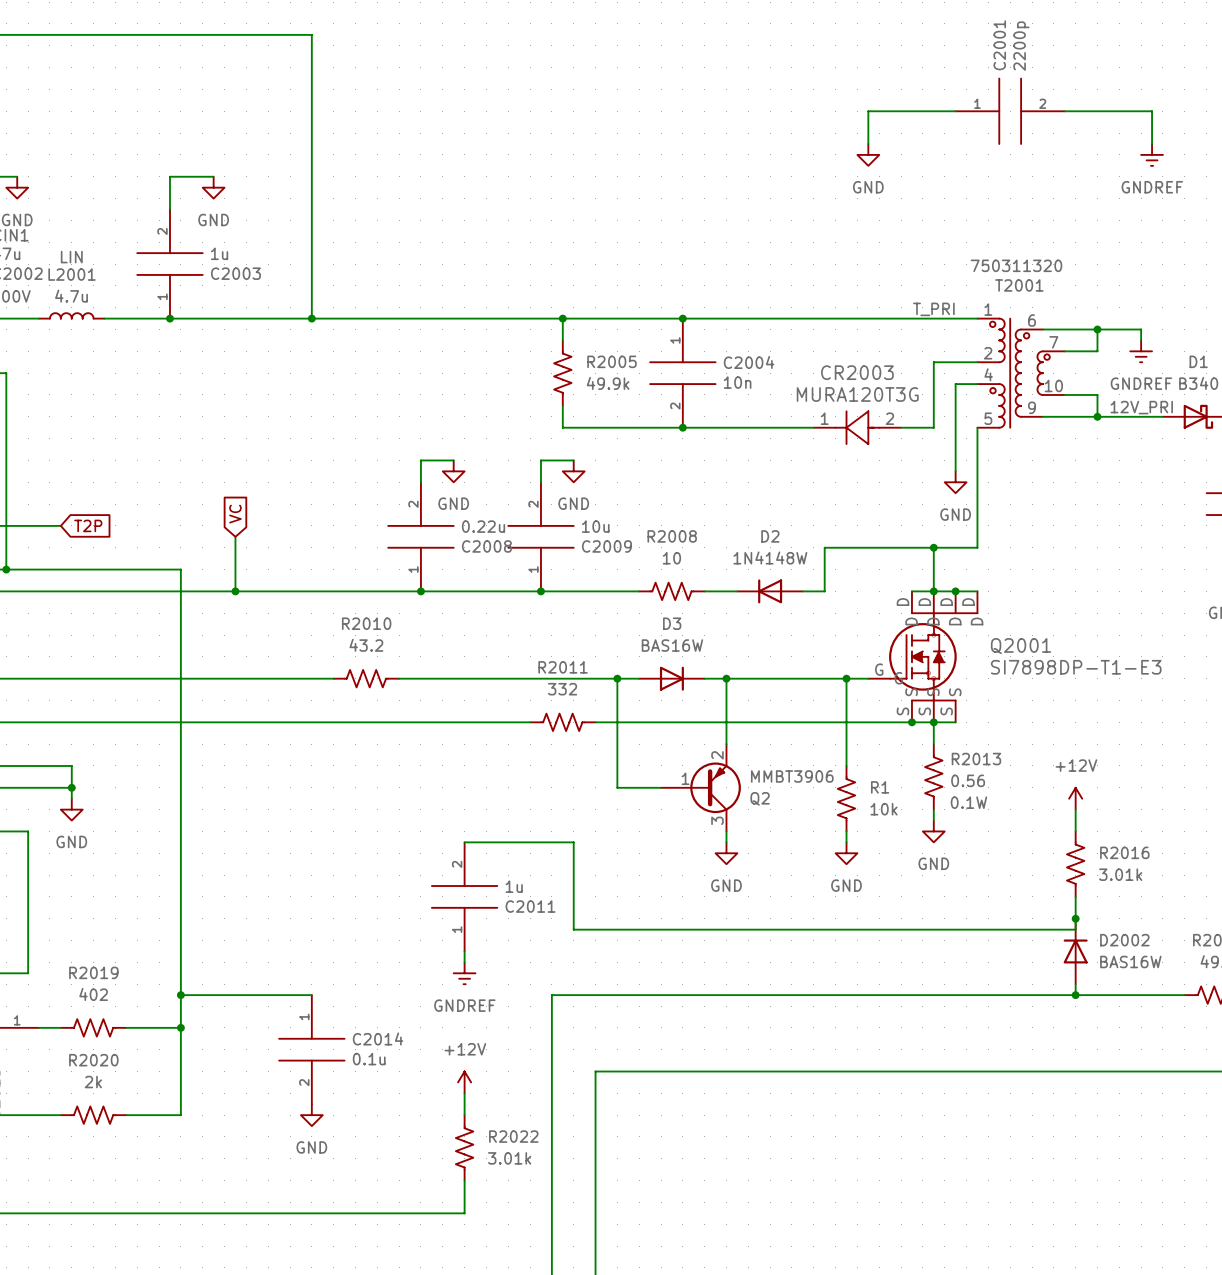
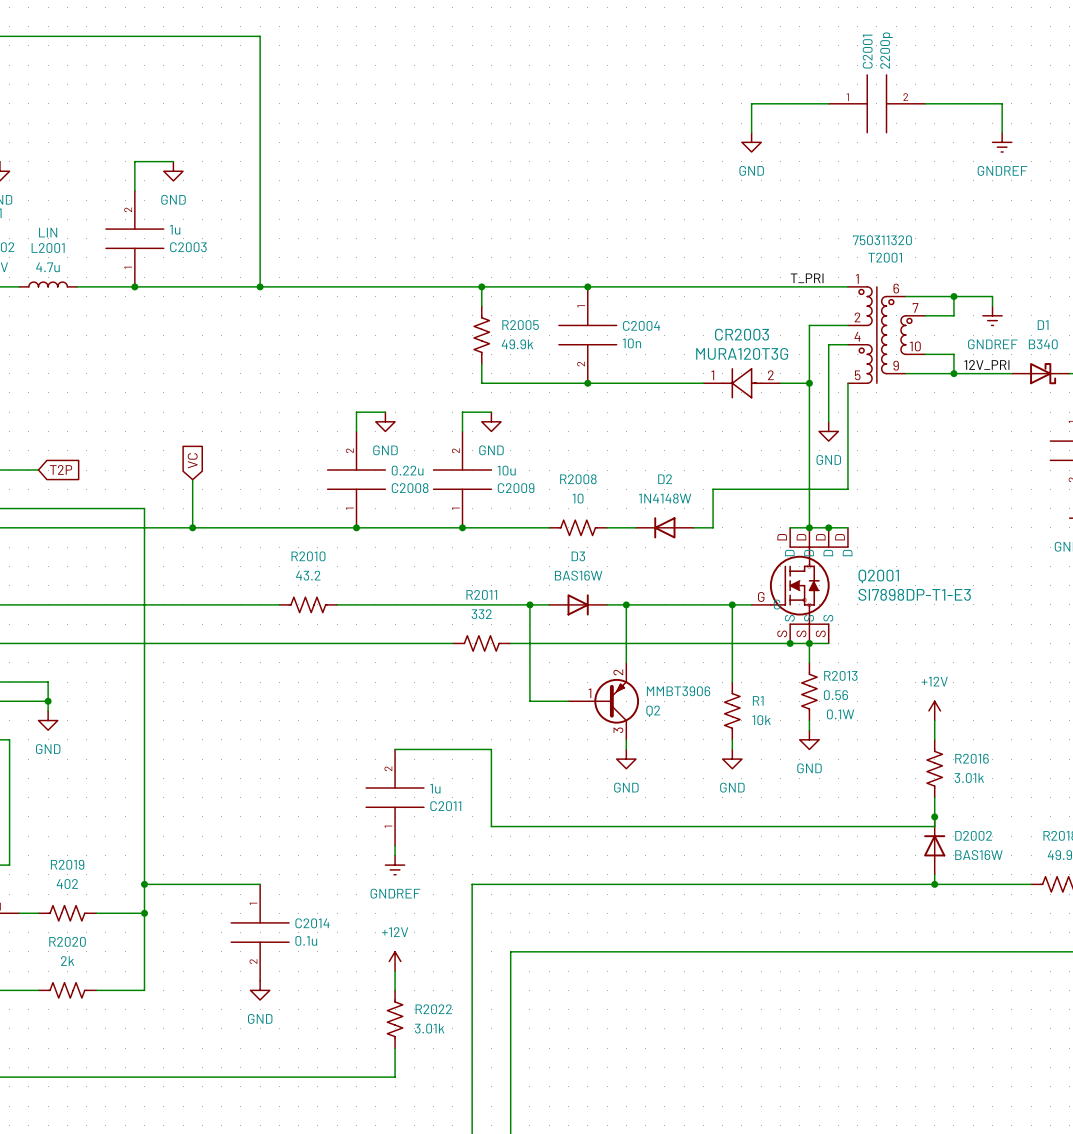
wire: none -> (809, 383) (809, 489)
junction: none -> (809, 383)
junction: (933, 547) -> none

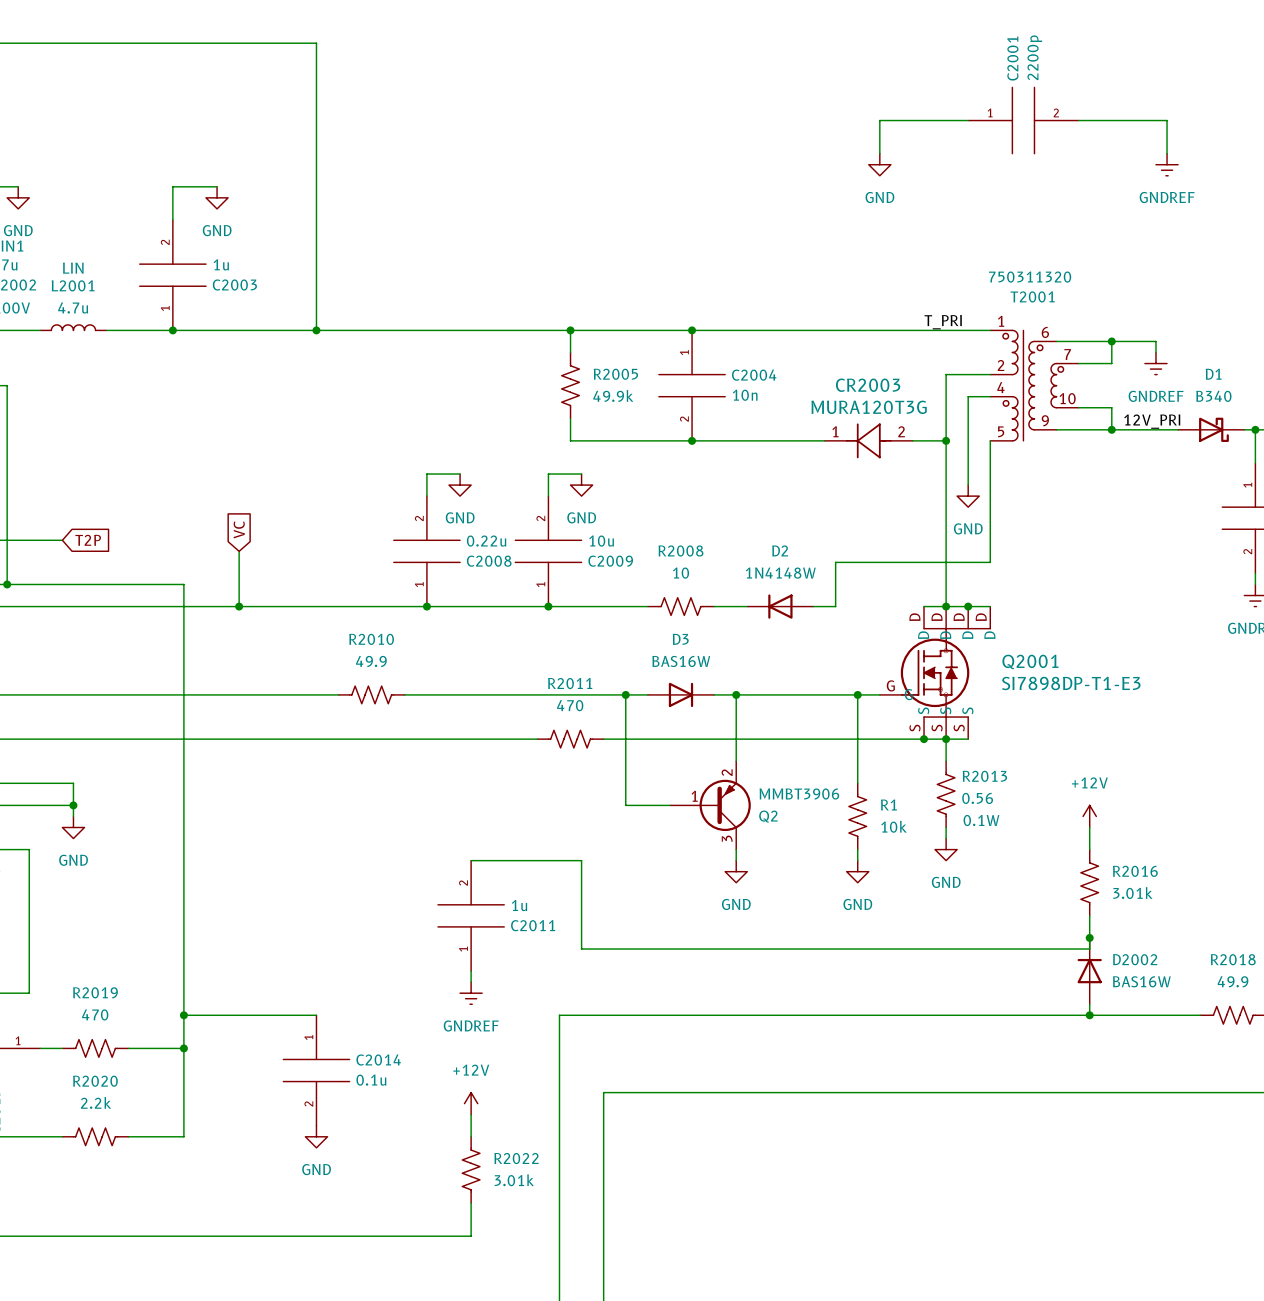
R2010 value: 43.2 (308, 575) -> 49.9 (371, 661)
R2011 value: 332 (481, 614) -> 470 (570, 705)
R2019 value: 402 (67, 884) -> 470 (95, 1014)
R2020 value: 2k (67, 961) -> 2.2k (96, 1102)

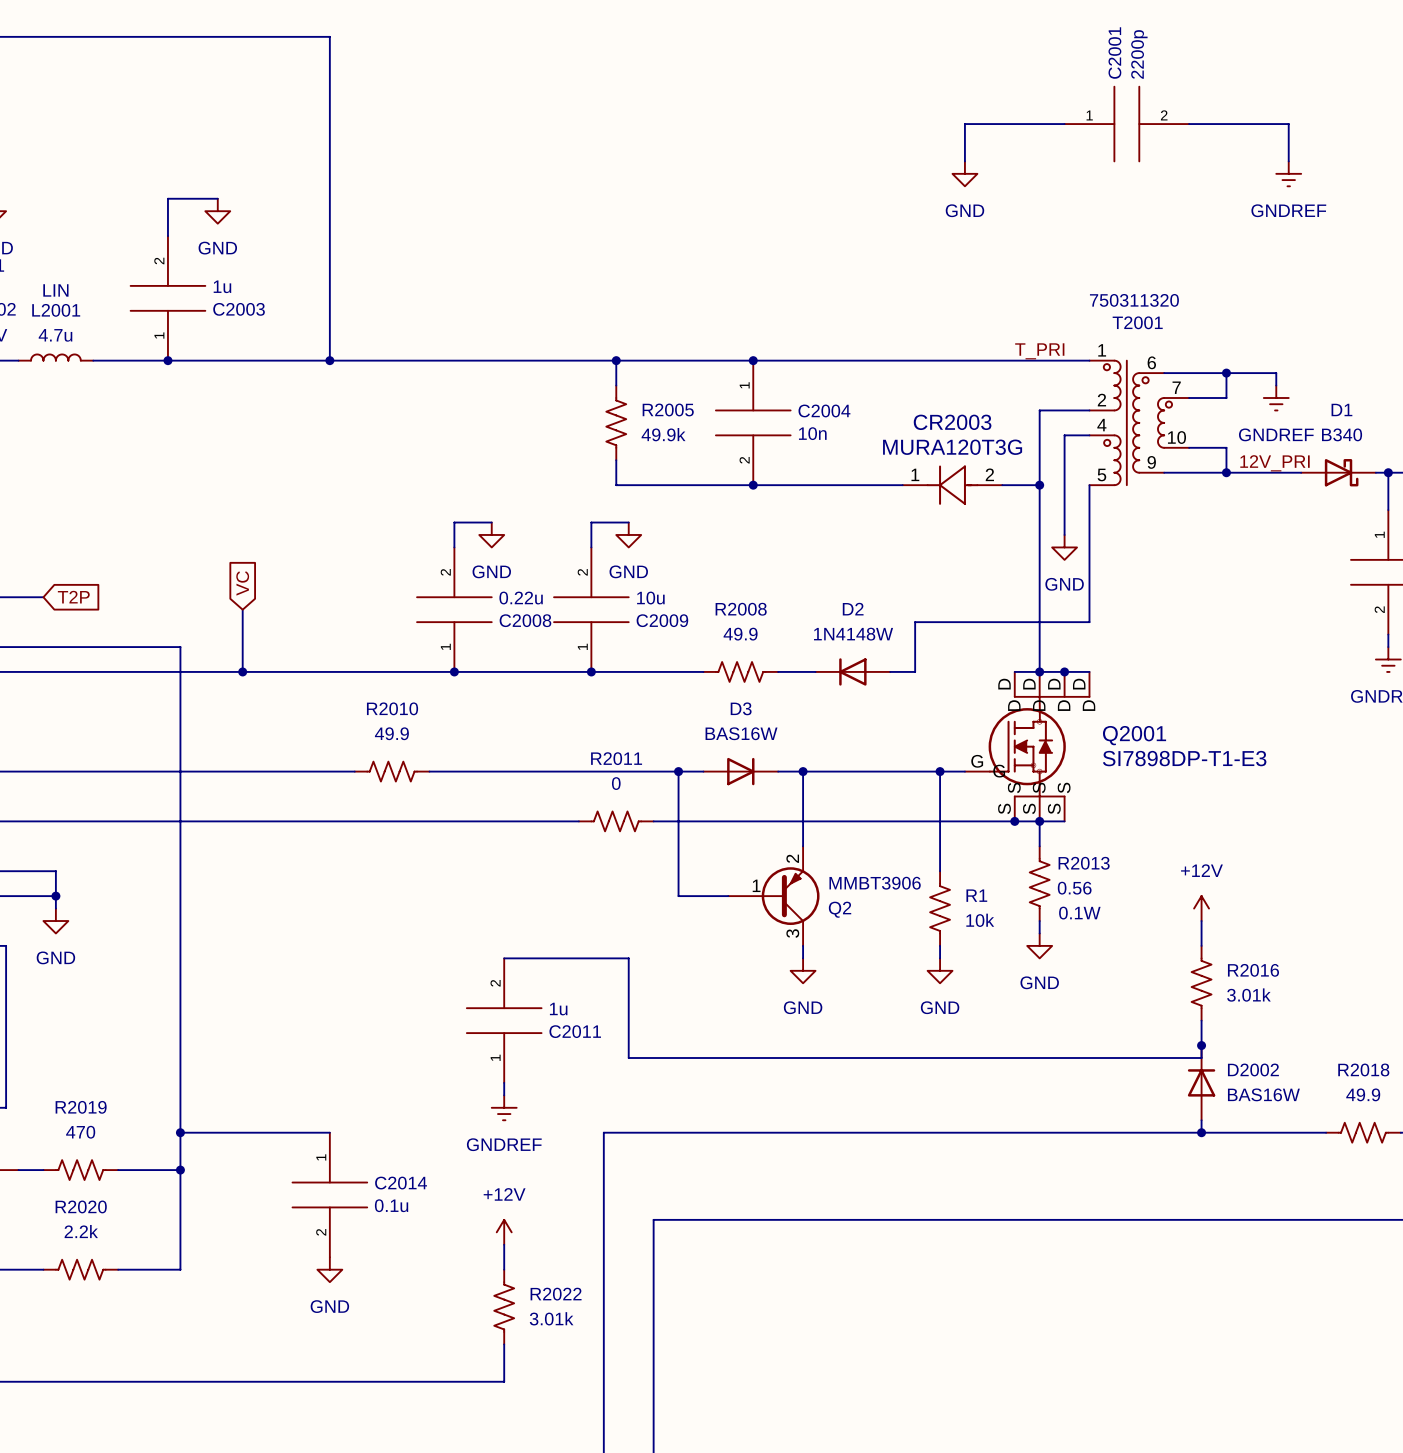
R2008 value: 10 (681, 573) -> 49.9 (740, 634)
R2011 value: 470 (570, 705) -> 0 (616, 783)

